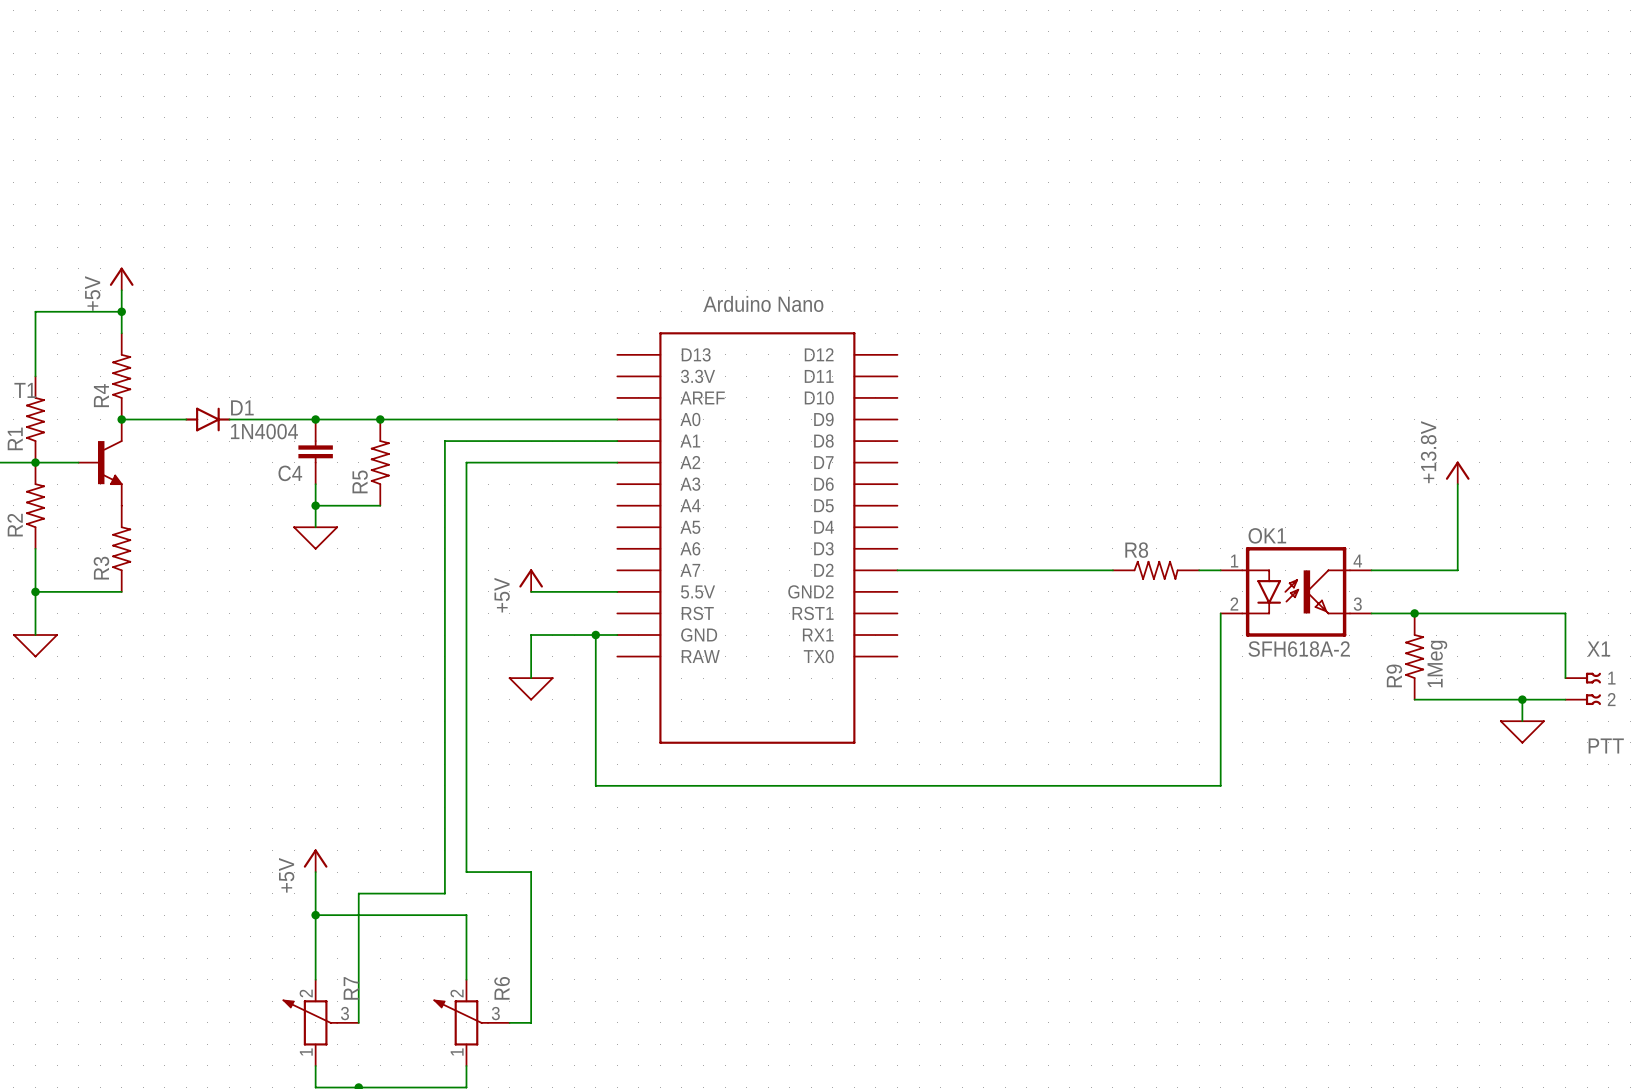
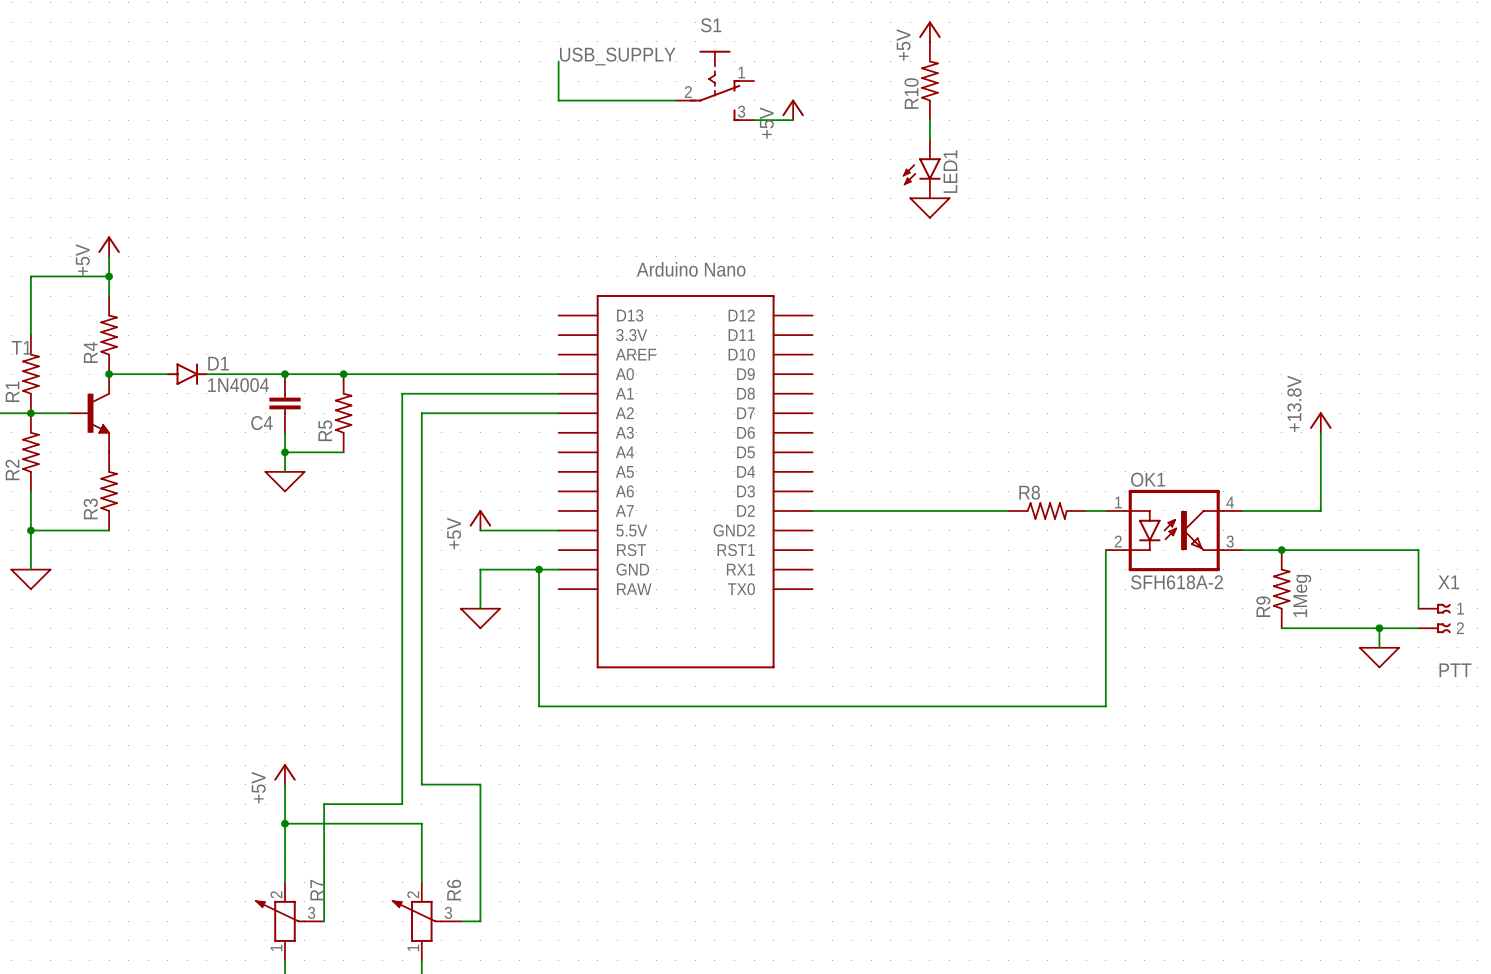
power symbol: none -> +5V (929, 31)
label: none -> USB_SUPPLY (617, 56)
wire: none -> (558, 61) (558, 100) (675, 100)
R10: none -> (929, 81)
S1: none -> (714, 85)
power symbol: none -> +5V (793, 109)
wire: none -> (754, 120) (793, 120)
wire: none -> (929, 120) (929, 139)
LED1: none -> (921, 168)
power symbol: none -> (929, 208)

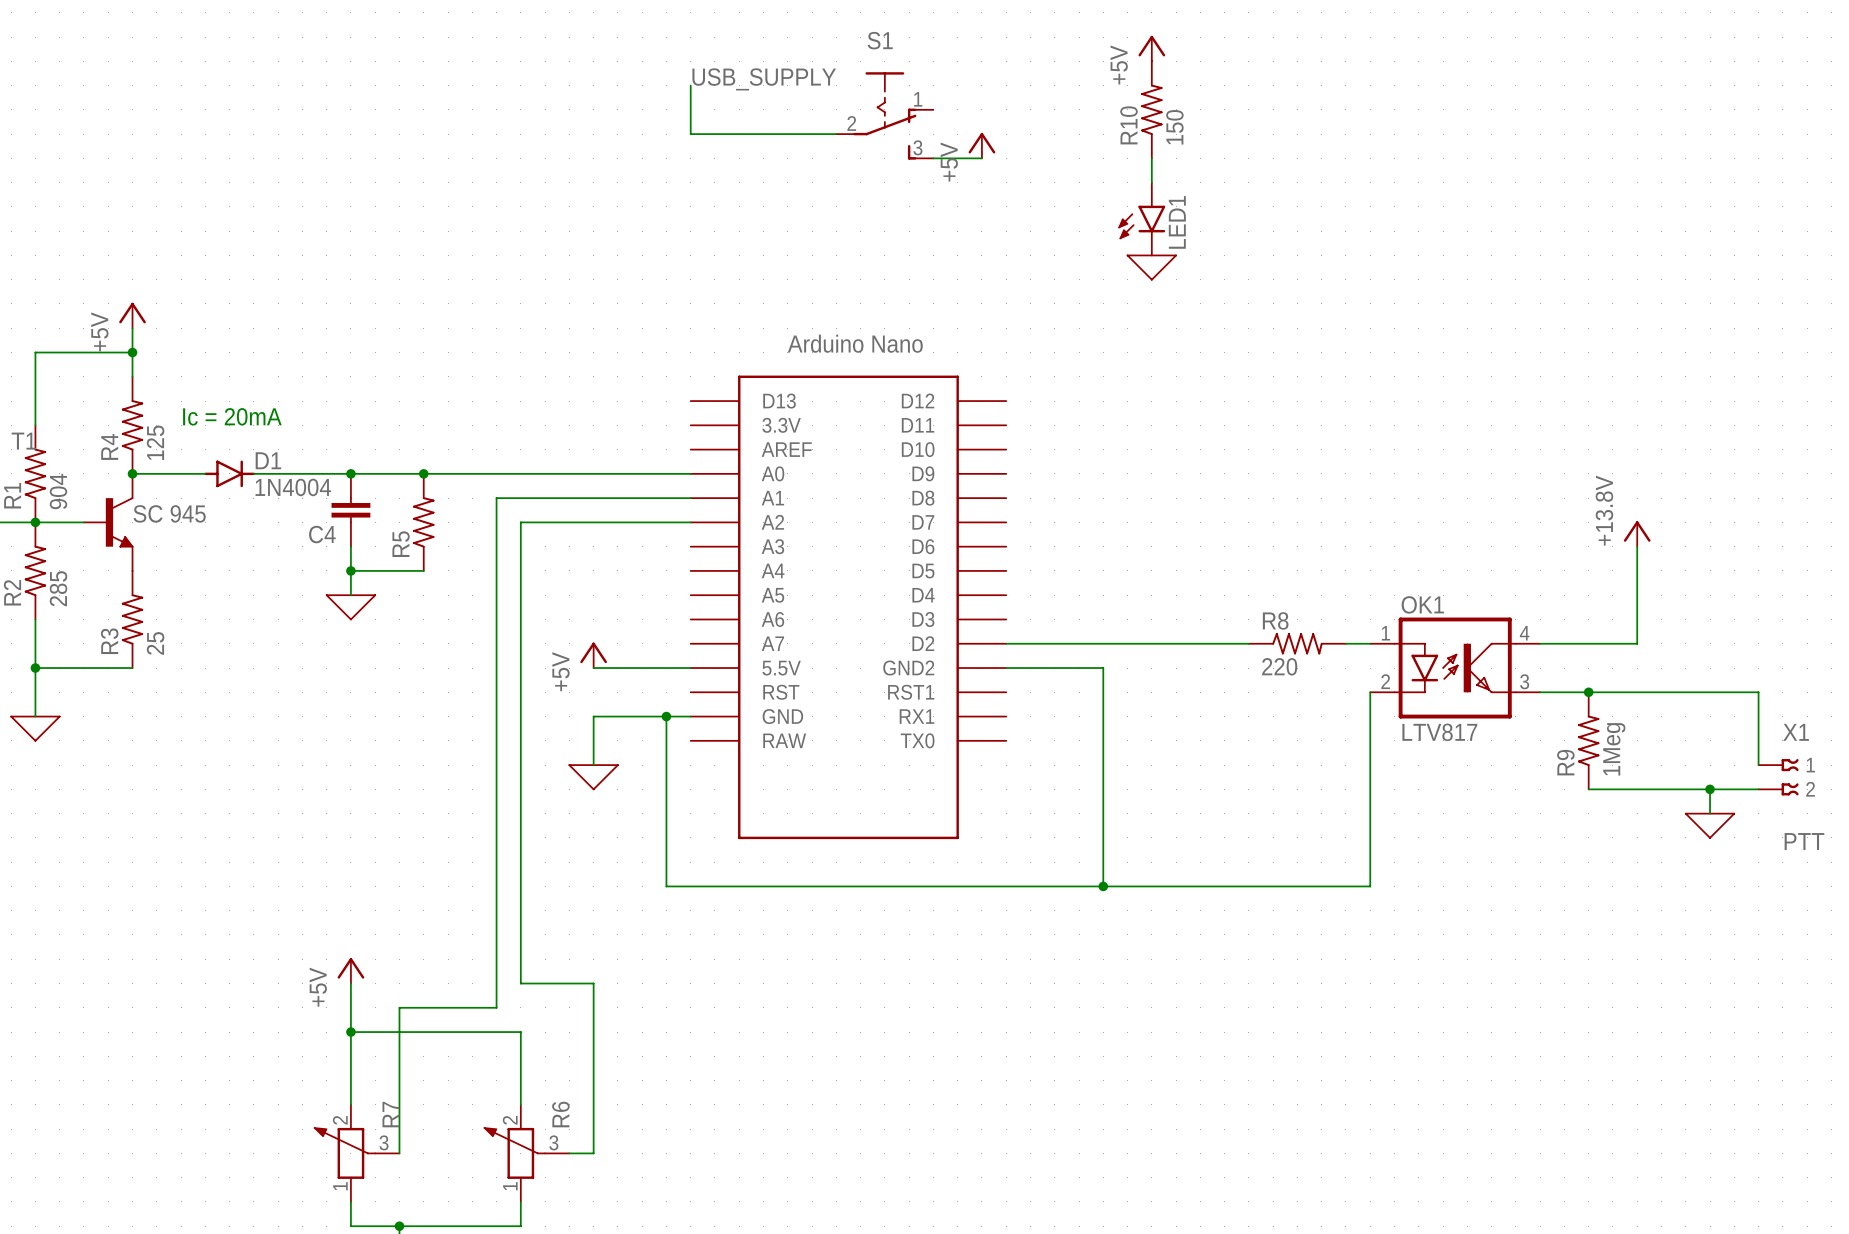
R10 value: none -> 150 (1174, 127)
text: none -> Ic = 20mA (232, 416)
R4 value: none -> 125 (155, 442)
R1 value: none -> 904 (58, 491)
T1 value: none -> SC 945 (169, 513)
R2 value: none -> 285 (58, 588)
R3 value: none -> 25 (155, 643)
R8 value: none -> 220 (1279, 666)
wire: none -> (1006, 668) (1103, 668) (1103, 886)
OK1 value: SFH618A-2 (1176, 582) -> LTV817 (1439, 732)
junction: none -> (1103, 886)

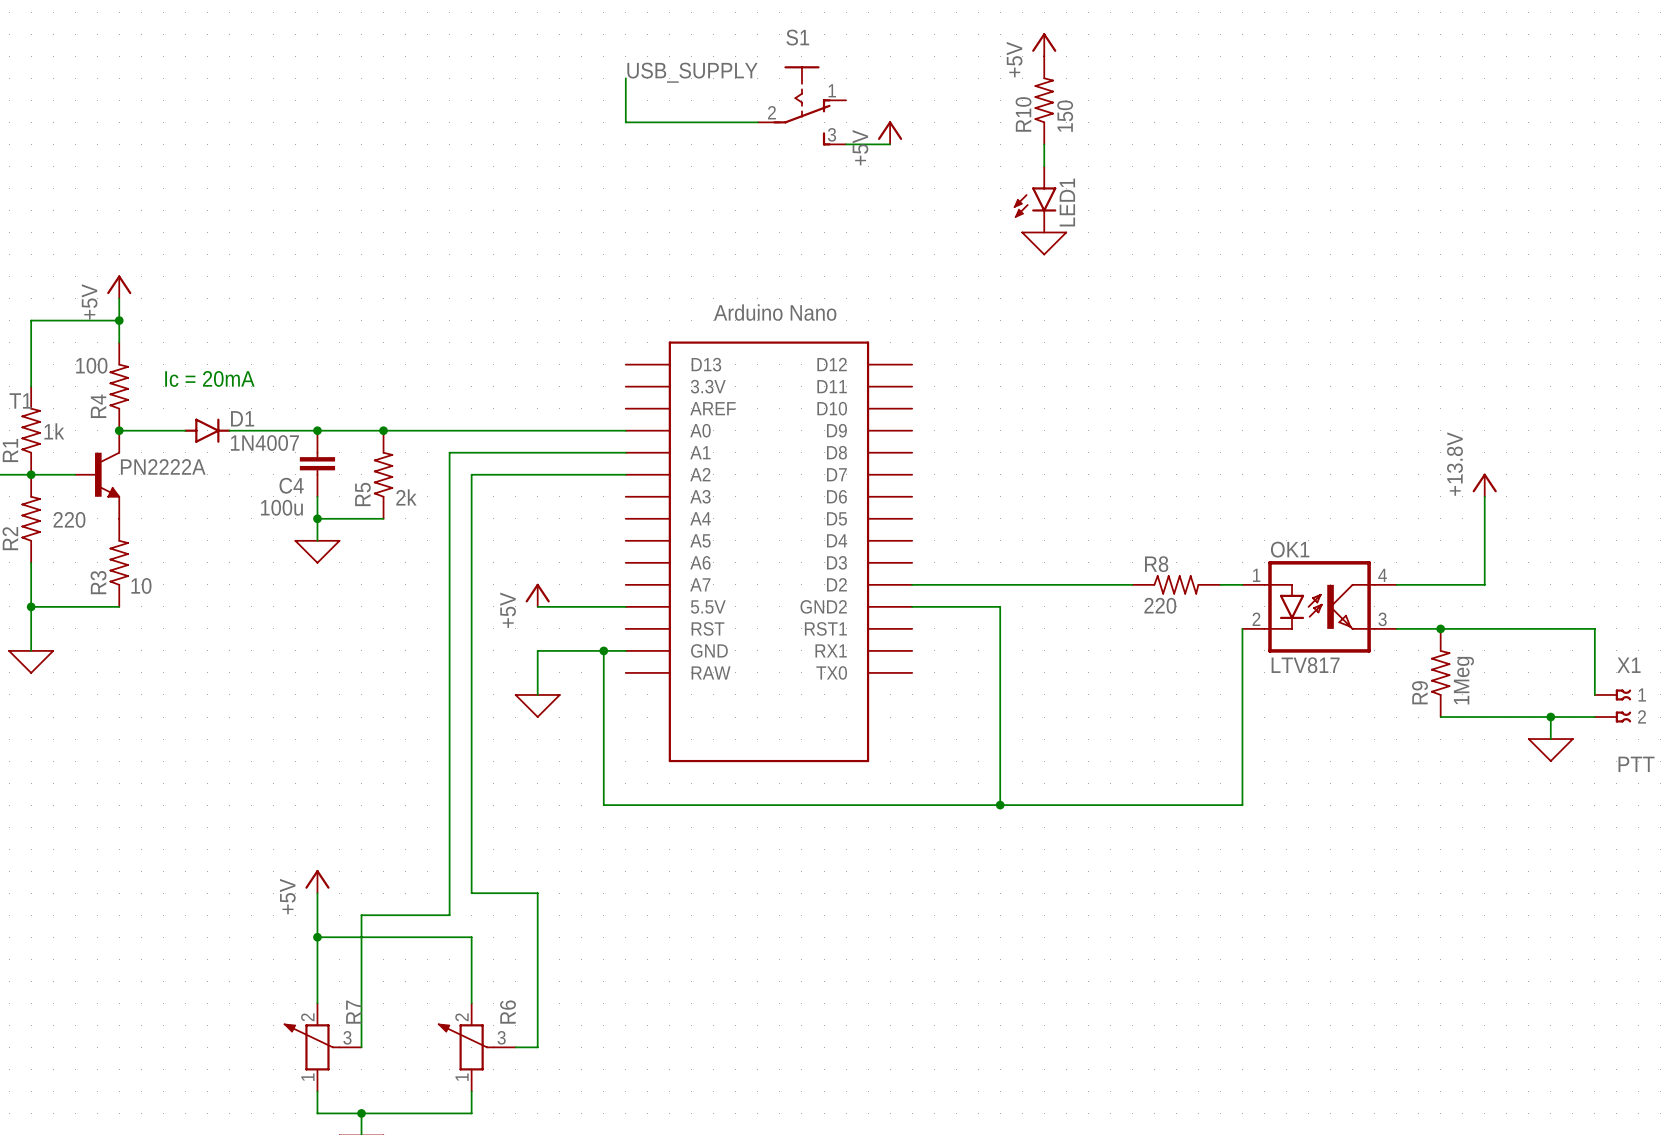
R4 value: 125 (155, 442) -> 100 (91, 365)
D1 value: 1N4004 (293, 487) -> 1N4007 (264, 443)
R1 value: 904 (58, 491) -> 1k (54, 431)
T1 value: SC 945 (169, 513) -> PN2222A (163, 466)
R5 value: none -> 2k (406, 497)
C4 value: none -> 100u (281, 507)
R2 value: 285 (58, 588) -> 220 (69, 519)
R3 value: 25 (155, 643) -> 10 (141, 585)

